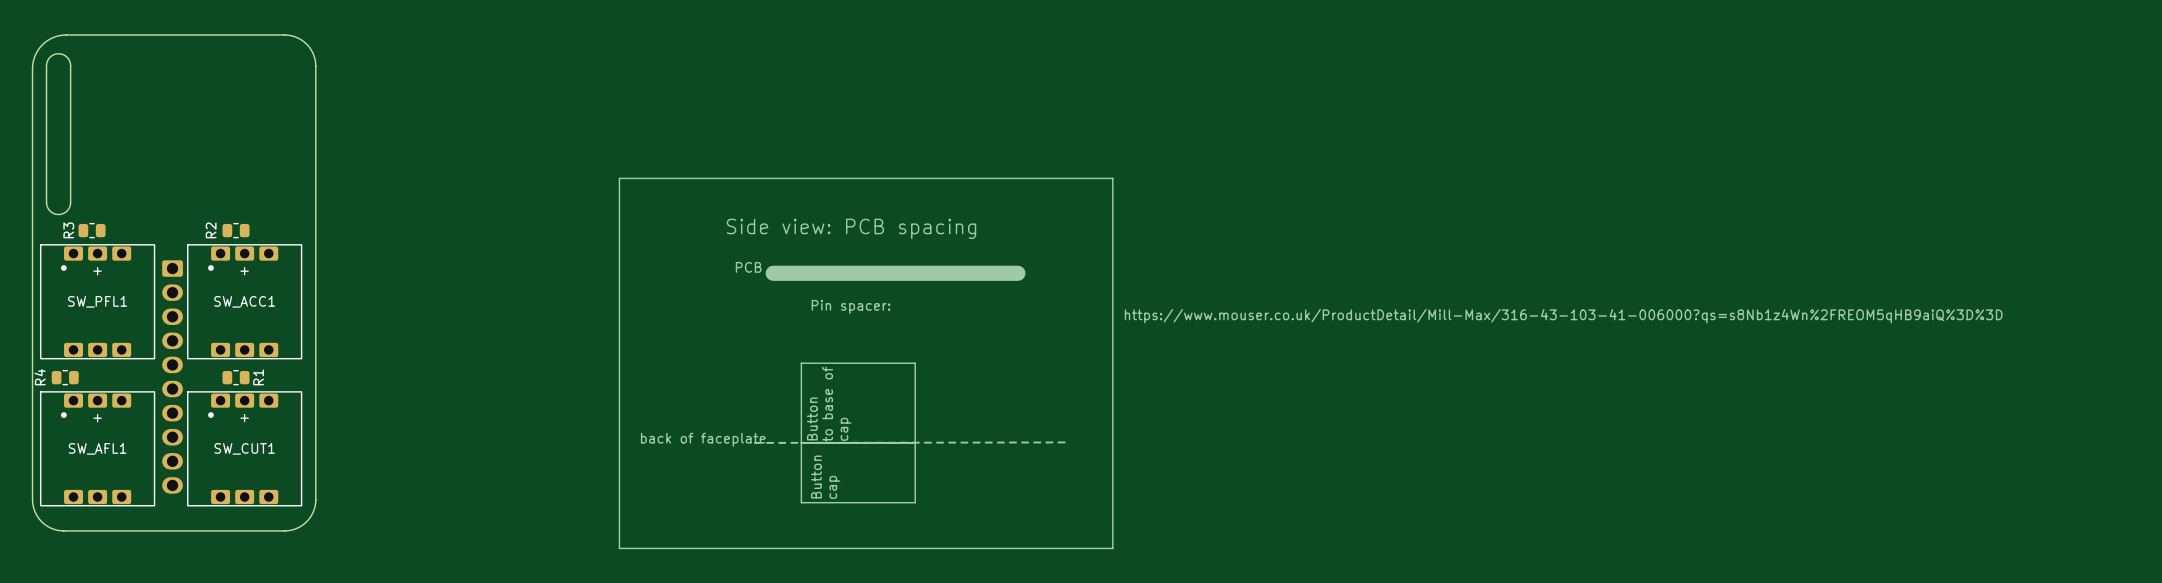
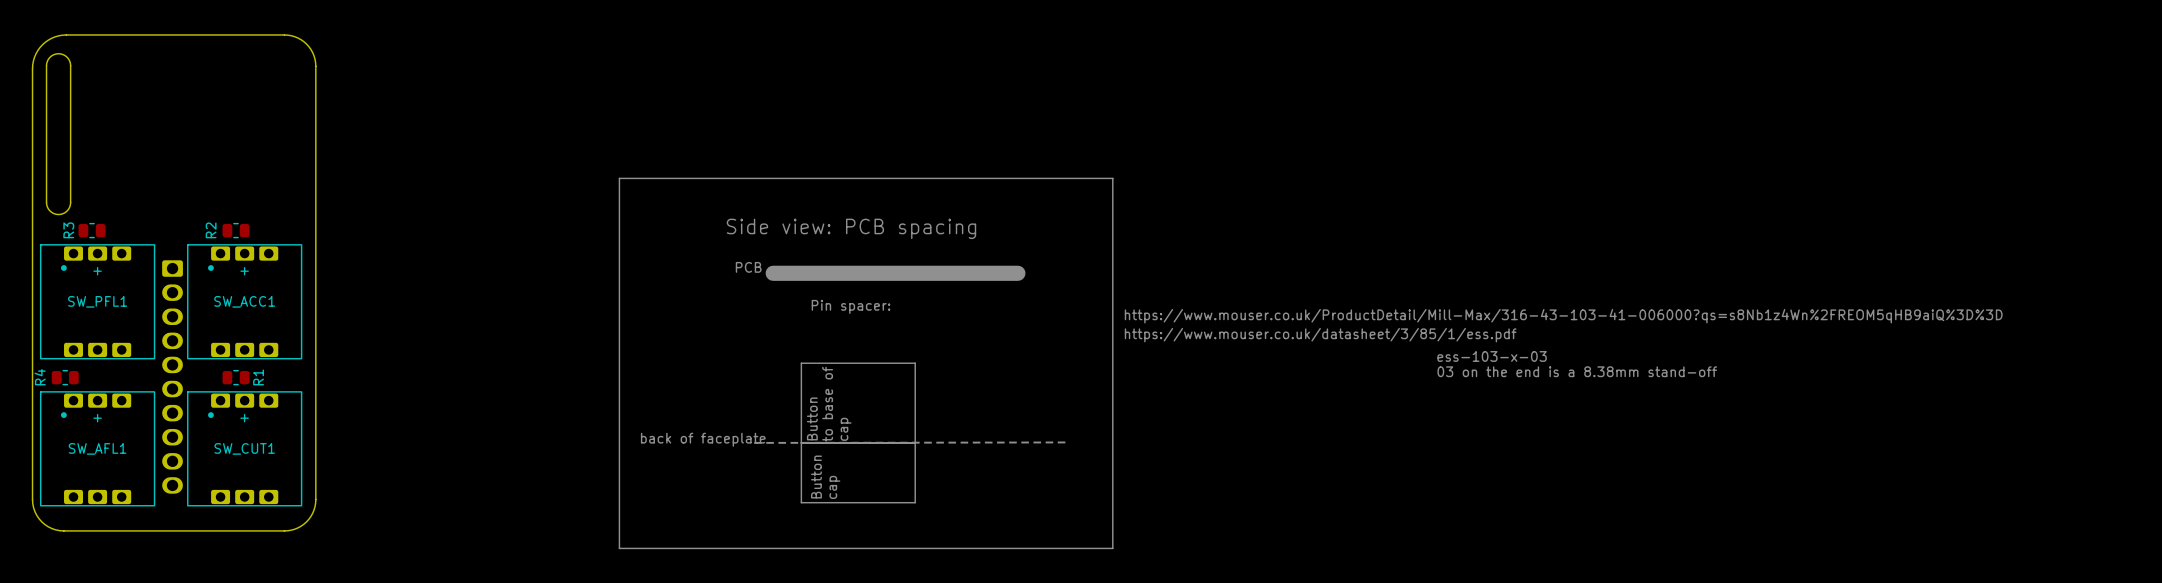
text: none -> https://www.mouser.co.uk/datasheet/3/85/1/ess.pdf (1320, 335)
text: none -> ess-103-x-03 (1492, 356)
text: none -> 03 on the end is a 8.38mm stand-off (1577, 371)

